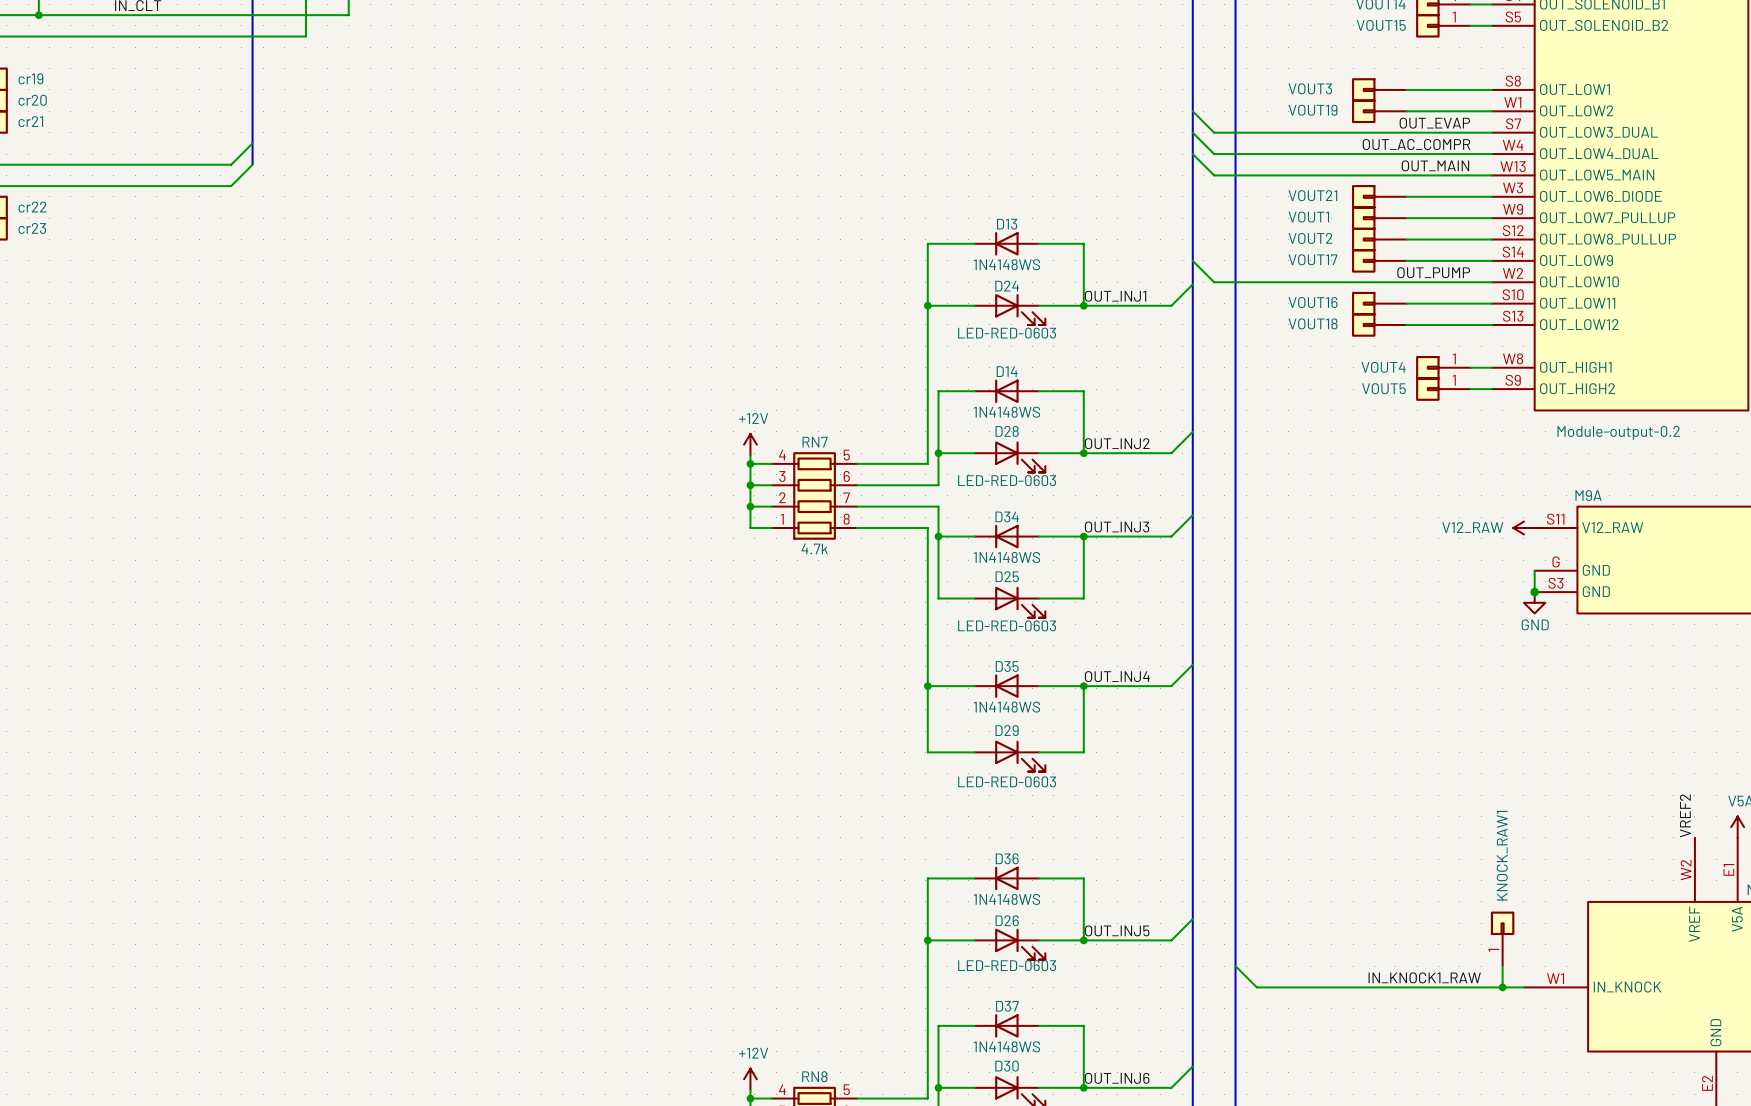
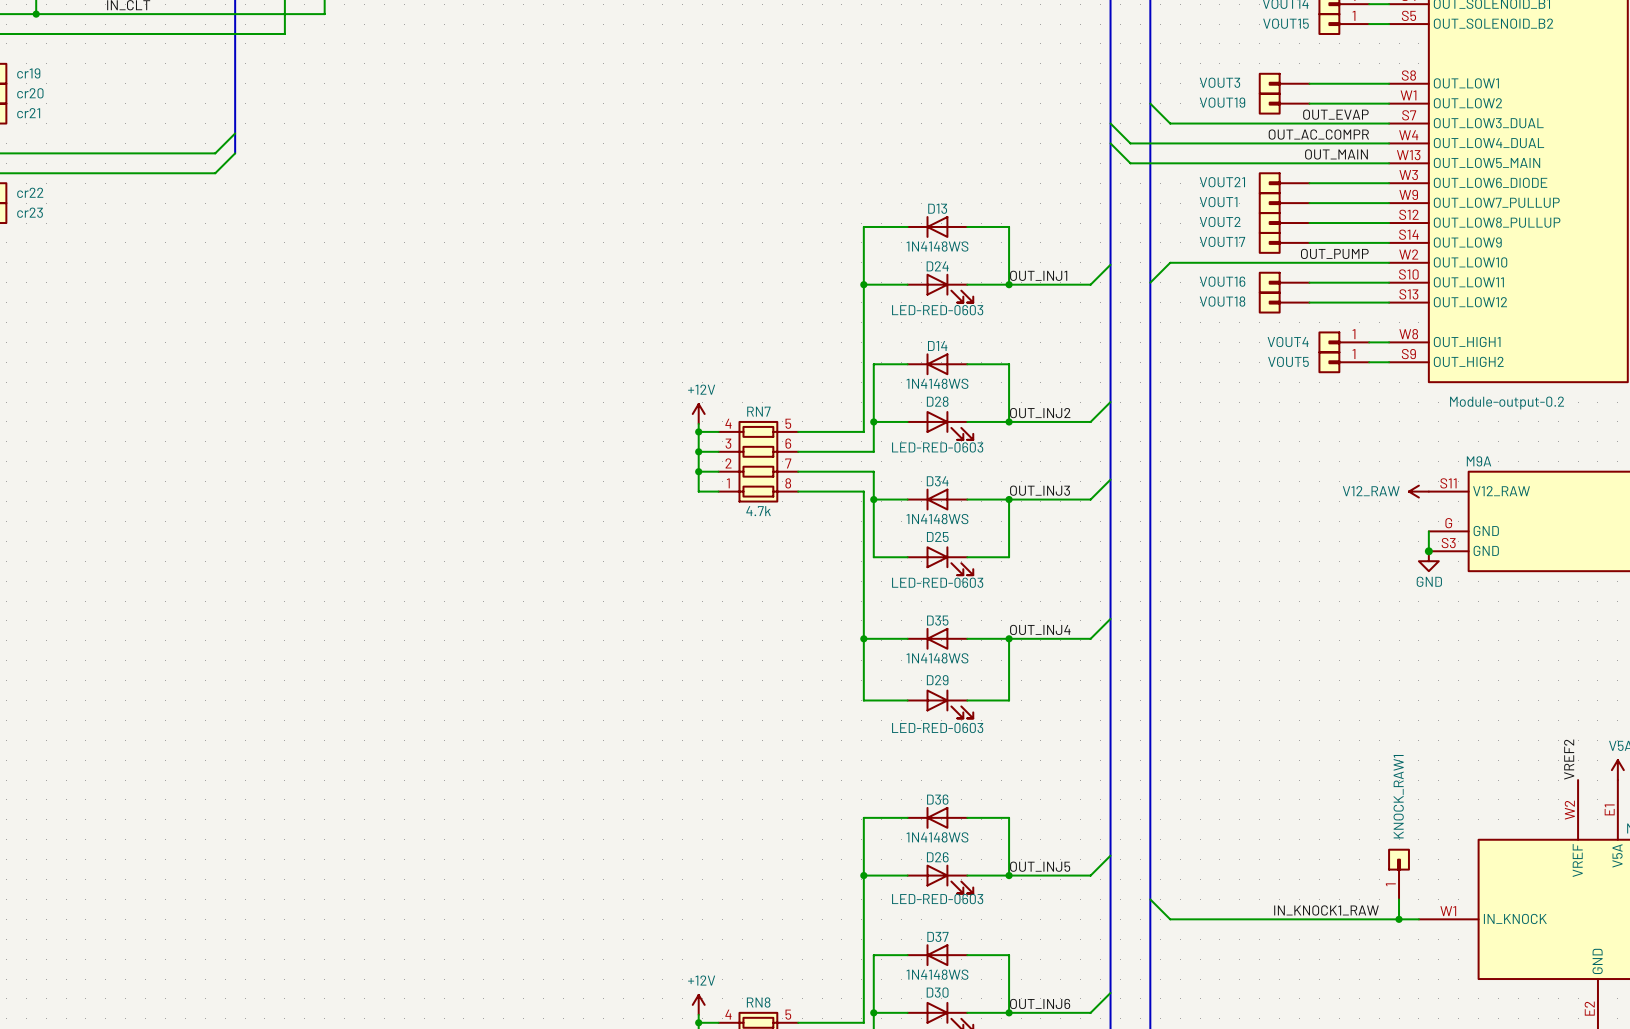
wire: (1192, 111) (1214, 132) (1256, 132) -> (1150, 103) (1170, 123)
wire: (1192, 260) (1214, 282) (1256, 282) -> (1150, 282) (1170, 262)

